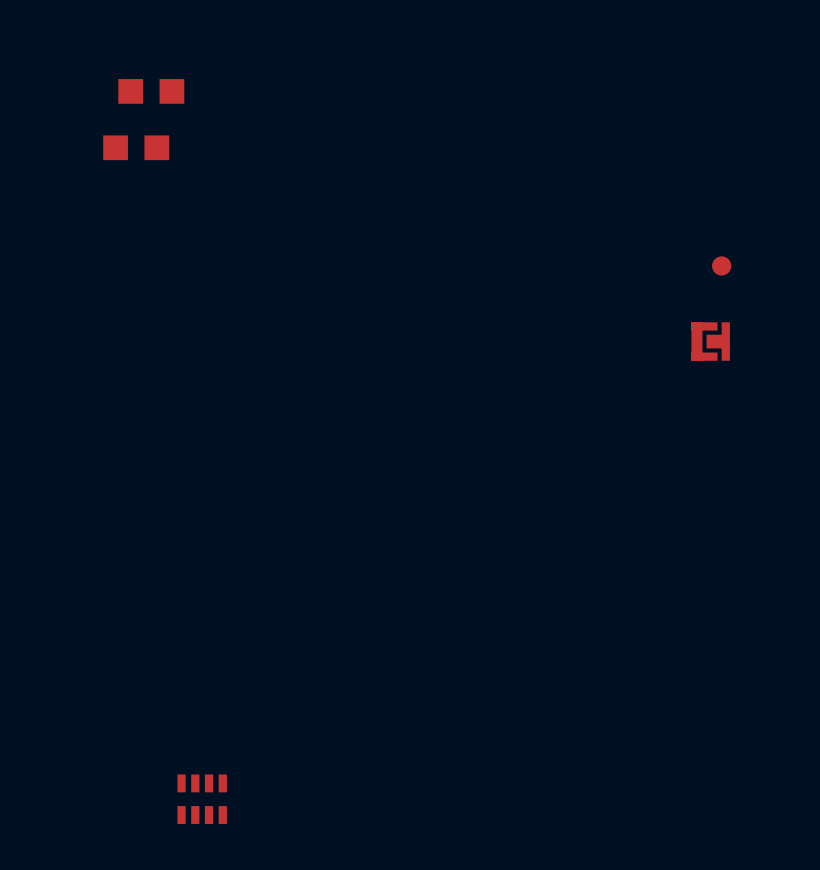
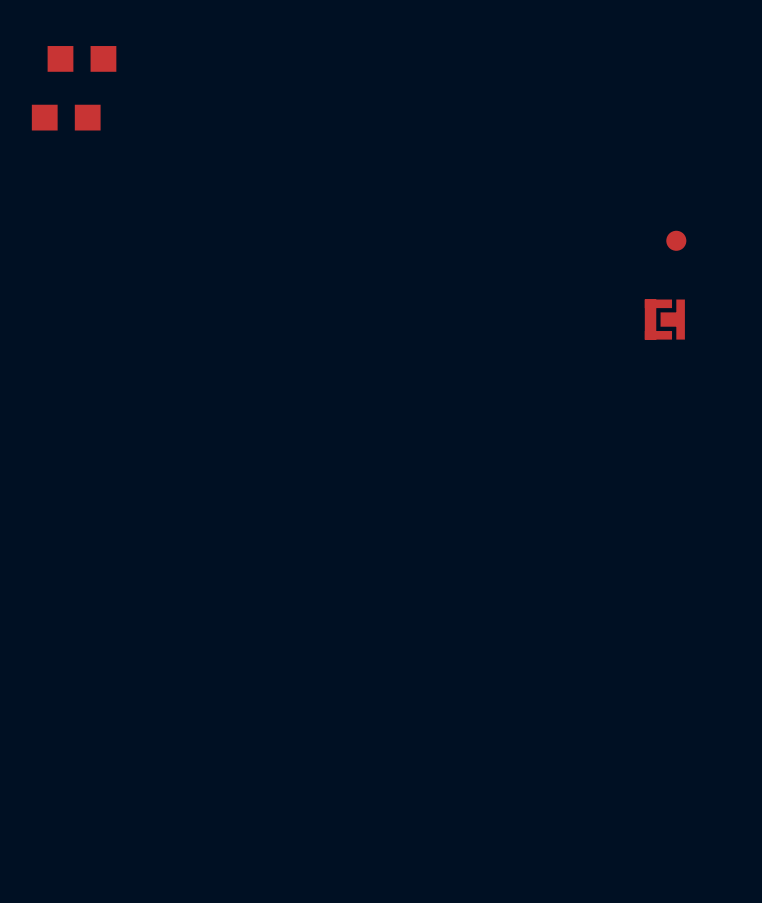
part: (202, 799) -> none

